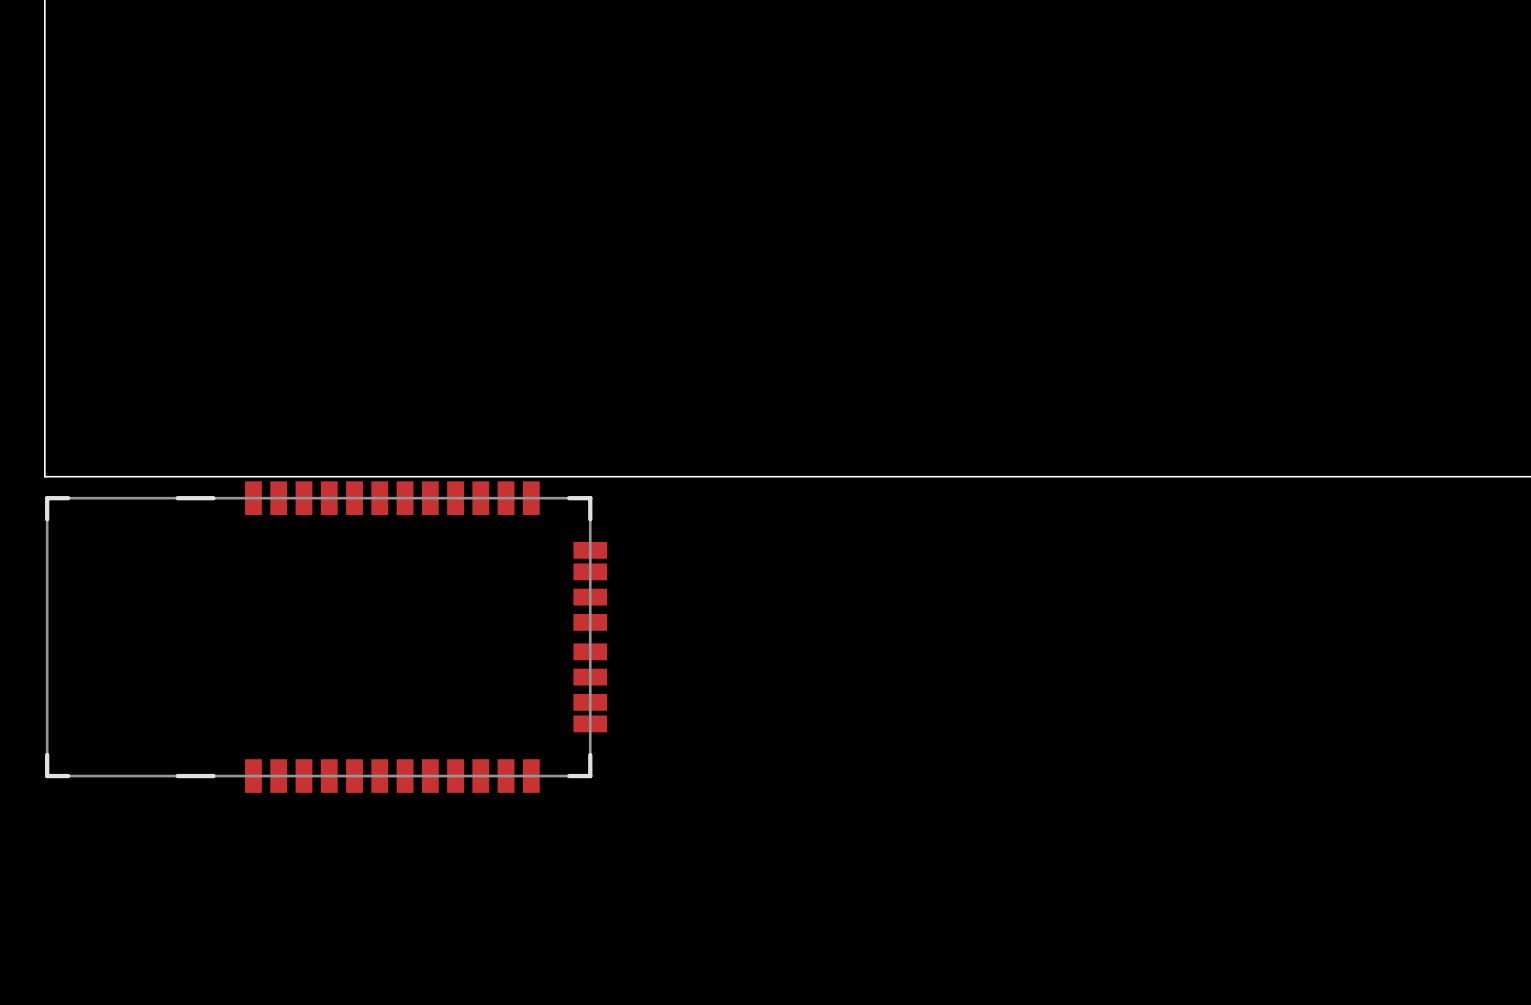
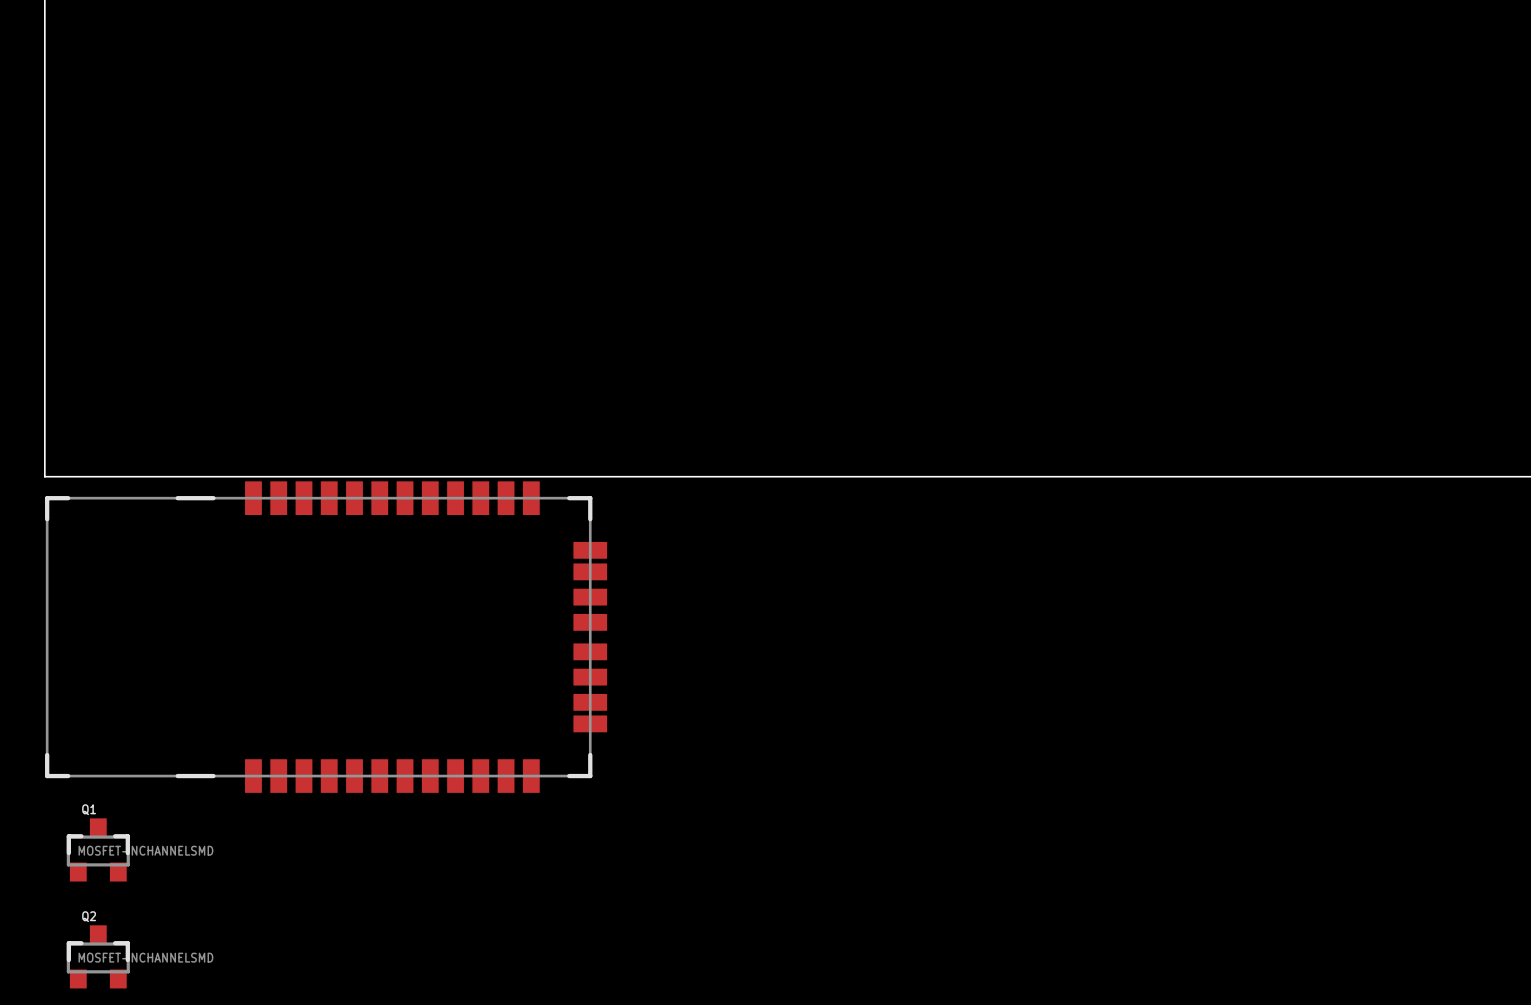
Q1: none -> MOSFET-NCHANNELSMD (98, 849)
Q2: none -> MOSFET-NCHANNELSMD (98, 956)

